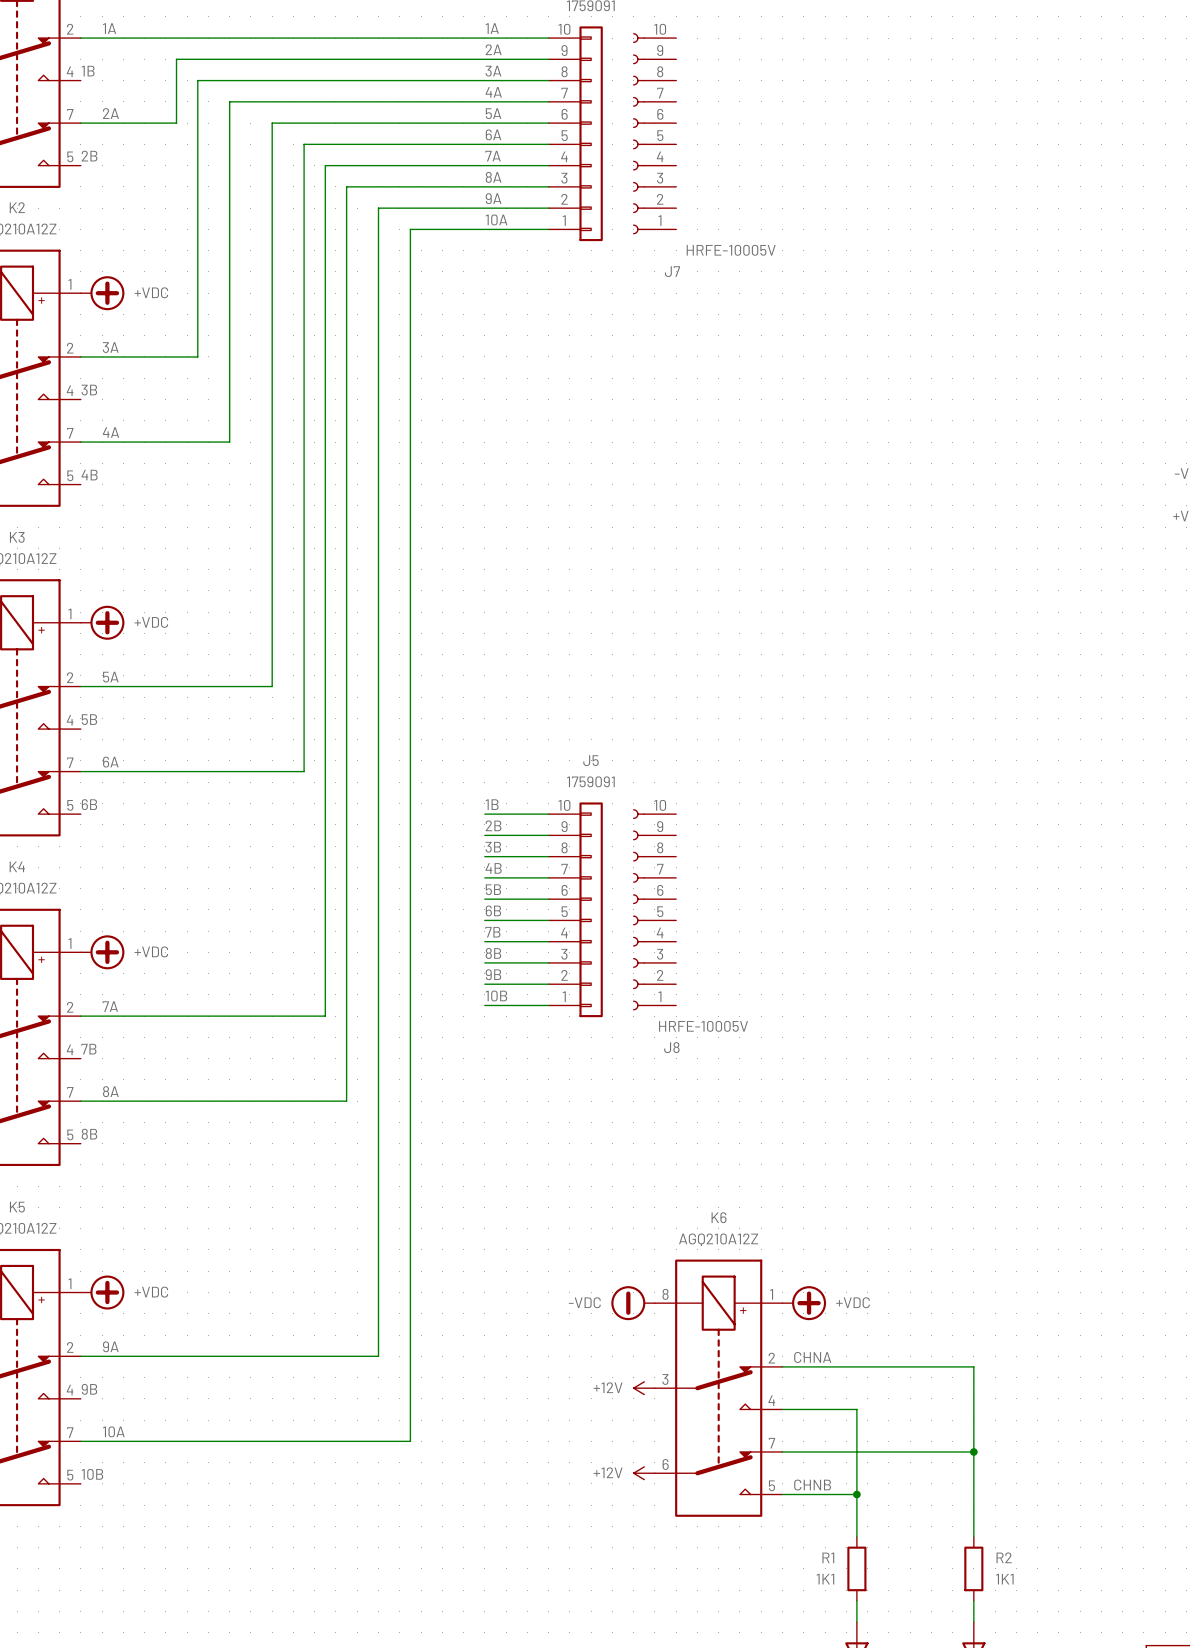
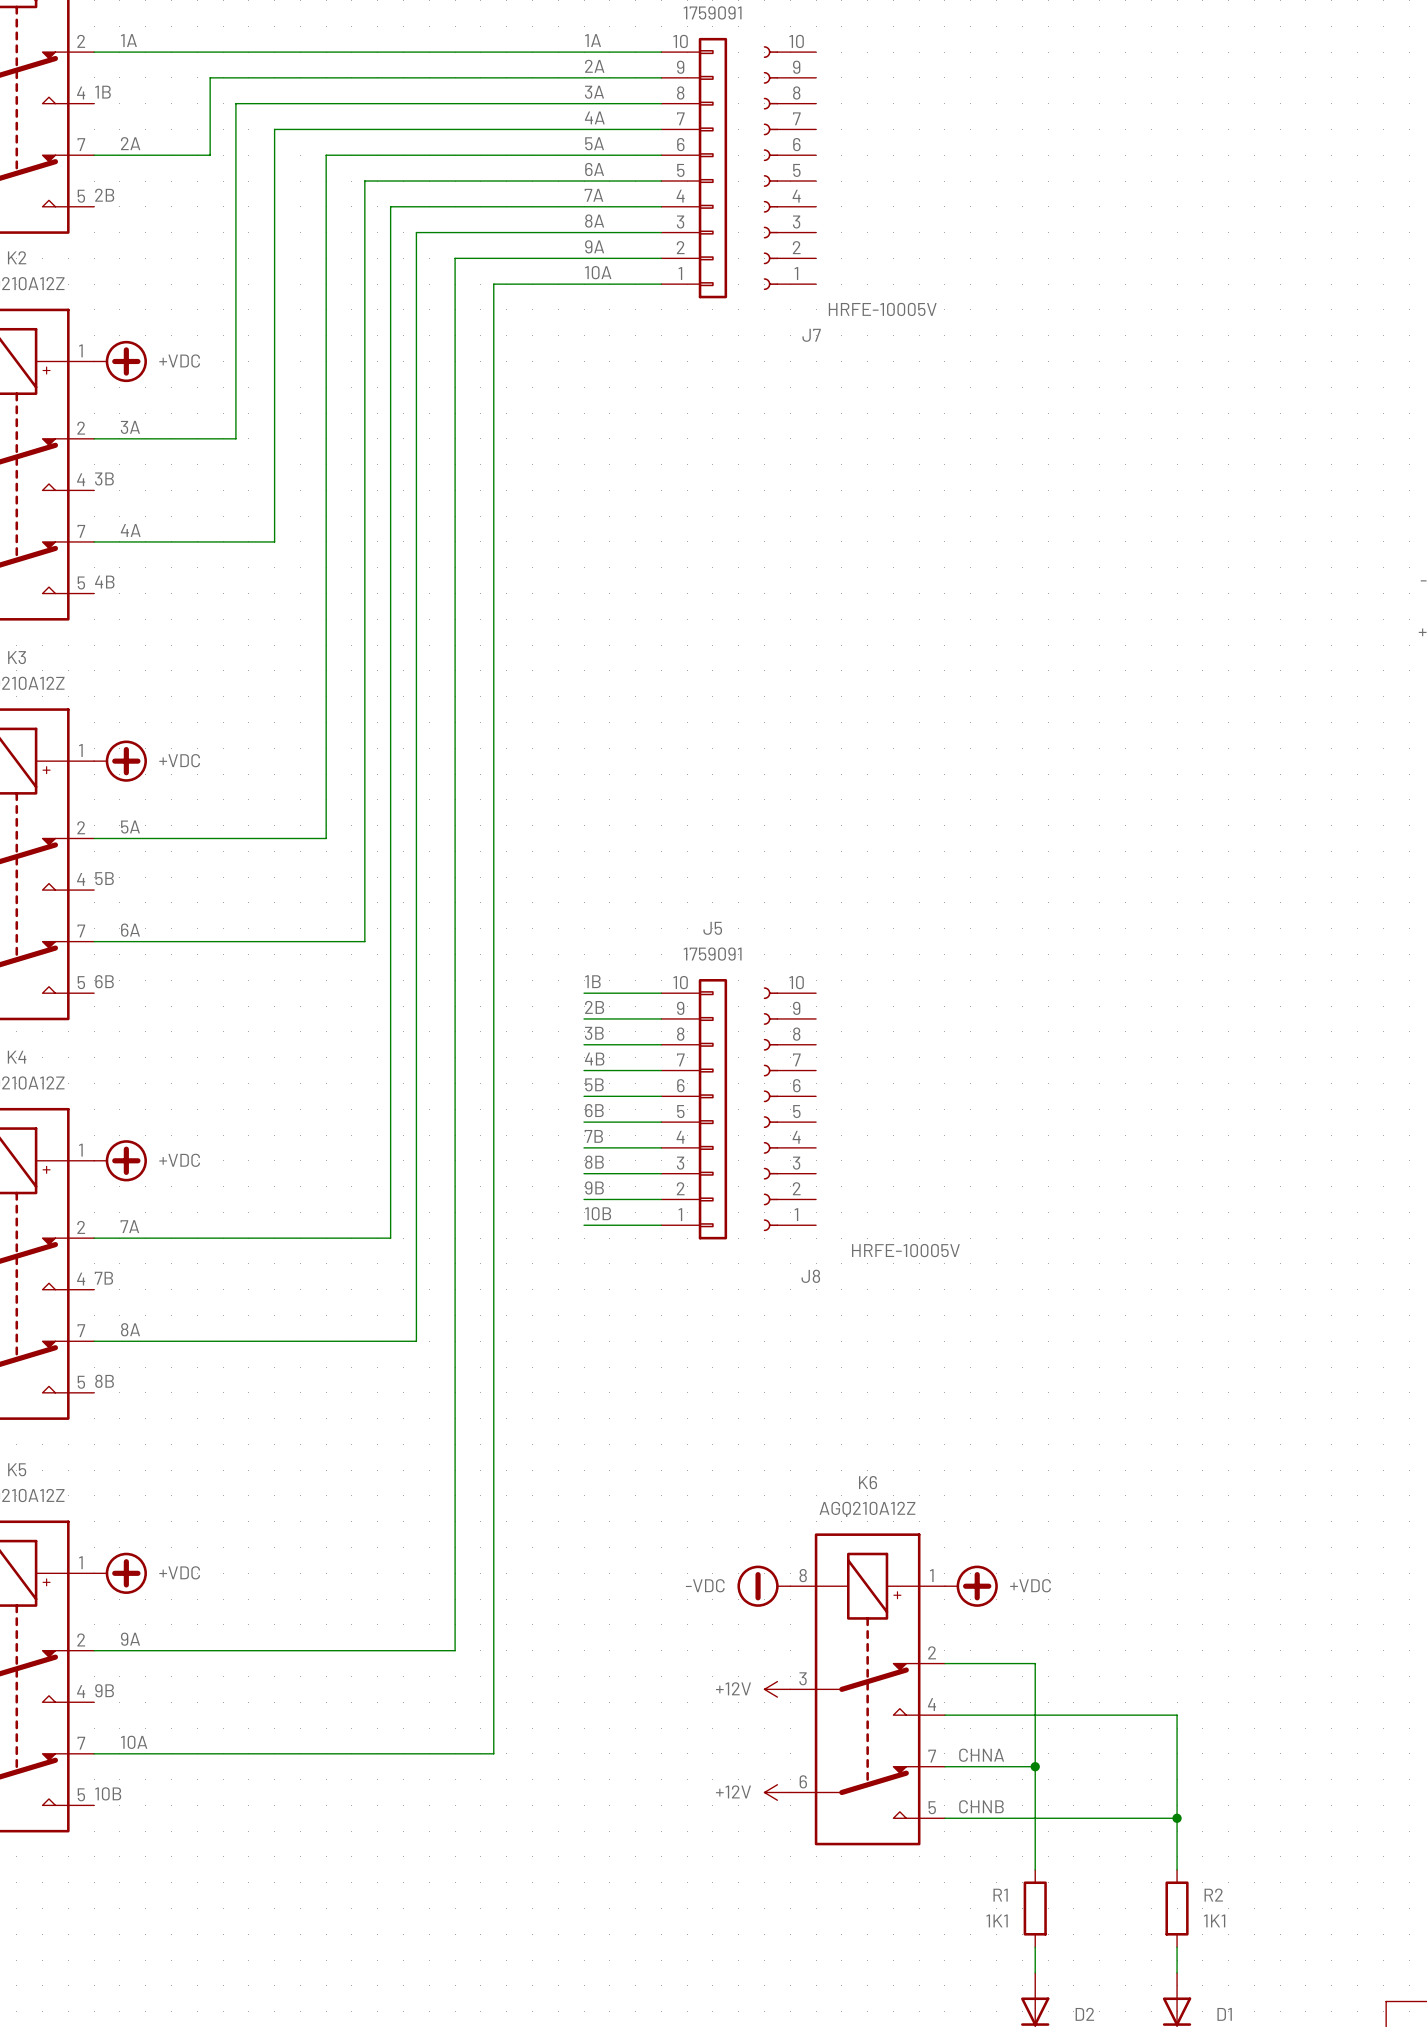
J8 value position: HRFE-10005V (703, 1026) -> HRFE-10005V (905, 1250)
label position: CHNA (812, 1357) -> CHNA (981, 1755)
wire: (856, 1366) (973, 1366) (973, 1409) -> (1035, 1663) (1035, 1715) (1177, 1715)
wire: (856, 1451) (973, 1451) -> (1035, 1818) (1177, 1818)
junction position: (973, 1451) -> (1177, 1818)
junction position: (856, 1494) -> (1035, 1766)

